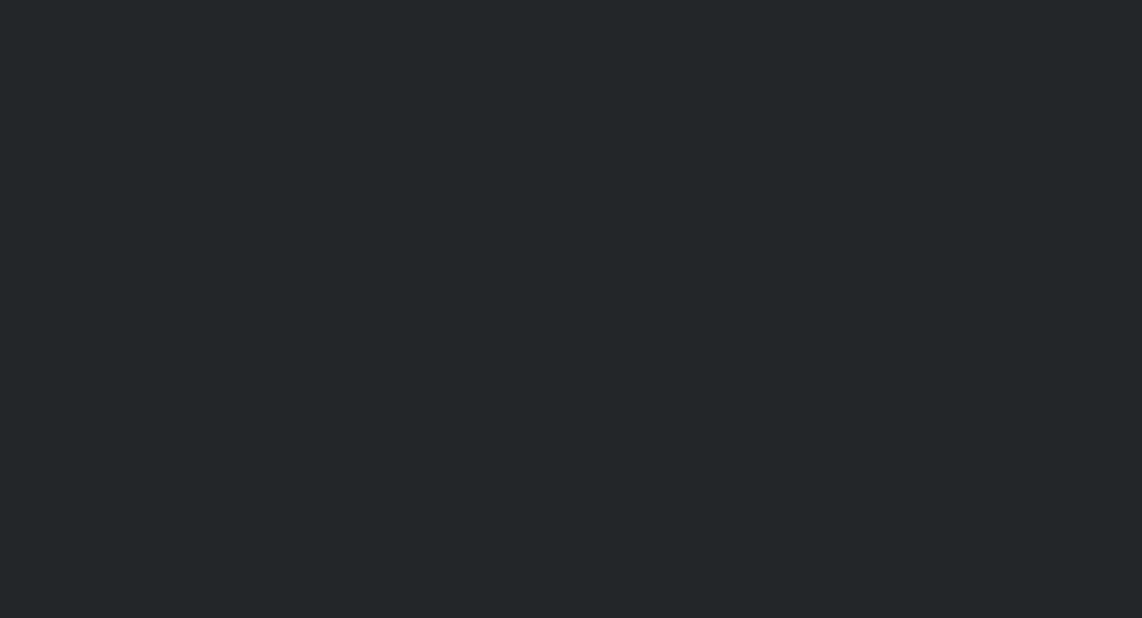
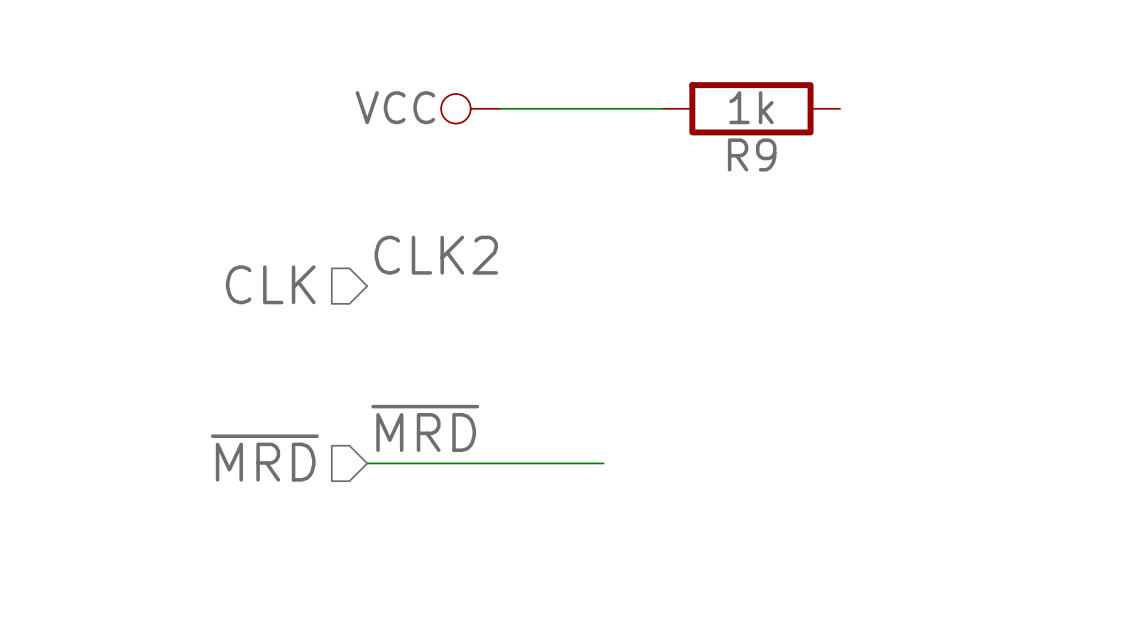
power symbol: none -> VCC (470, 108)
wire: none -> (500, 108) (662, 108)
R9: none -> 1k (751, 108)
label: none -> CLK2 (436, 255)
hierarchical label: none -> CLK (270, 284)
label: none -> ~{MRD} (425, 428)
hierarchical label: none -> ~{MRD} (264, 458)
wire: none -> (367, 463) (603, 463)

